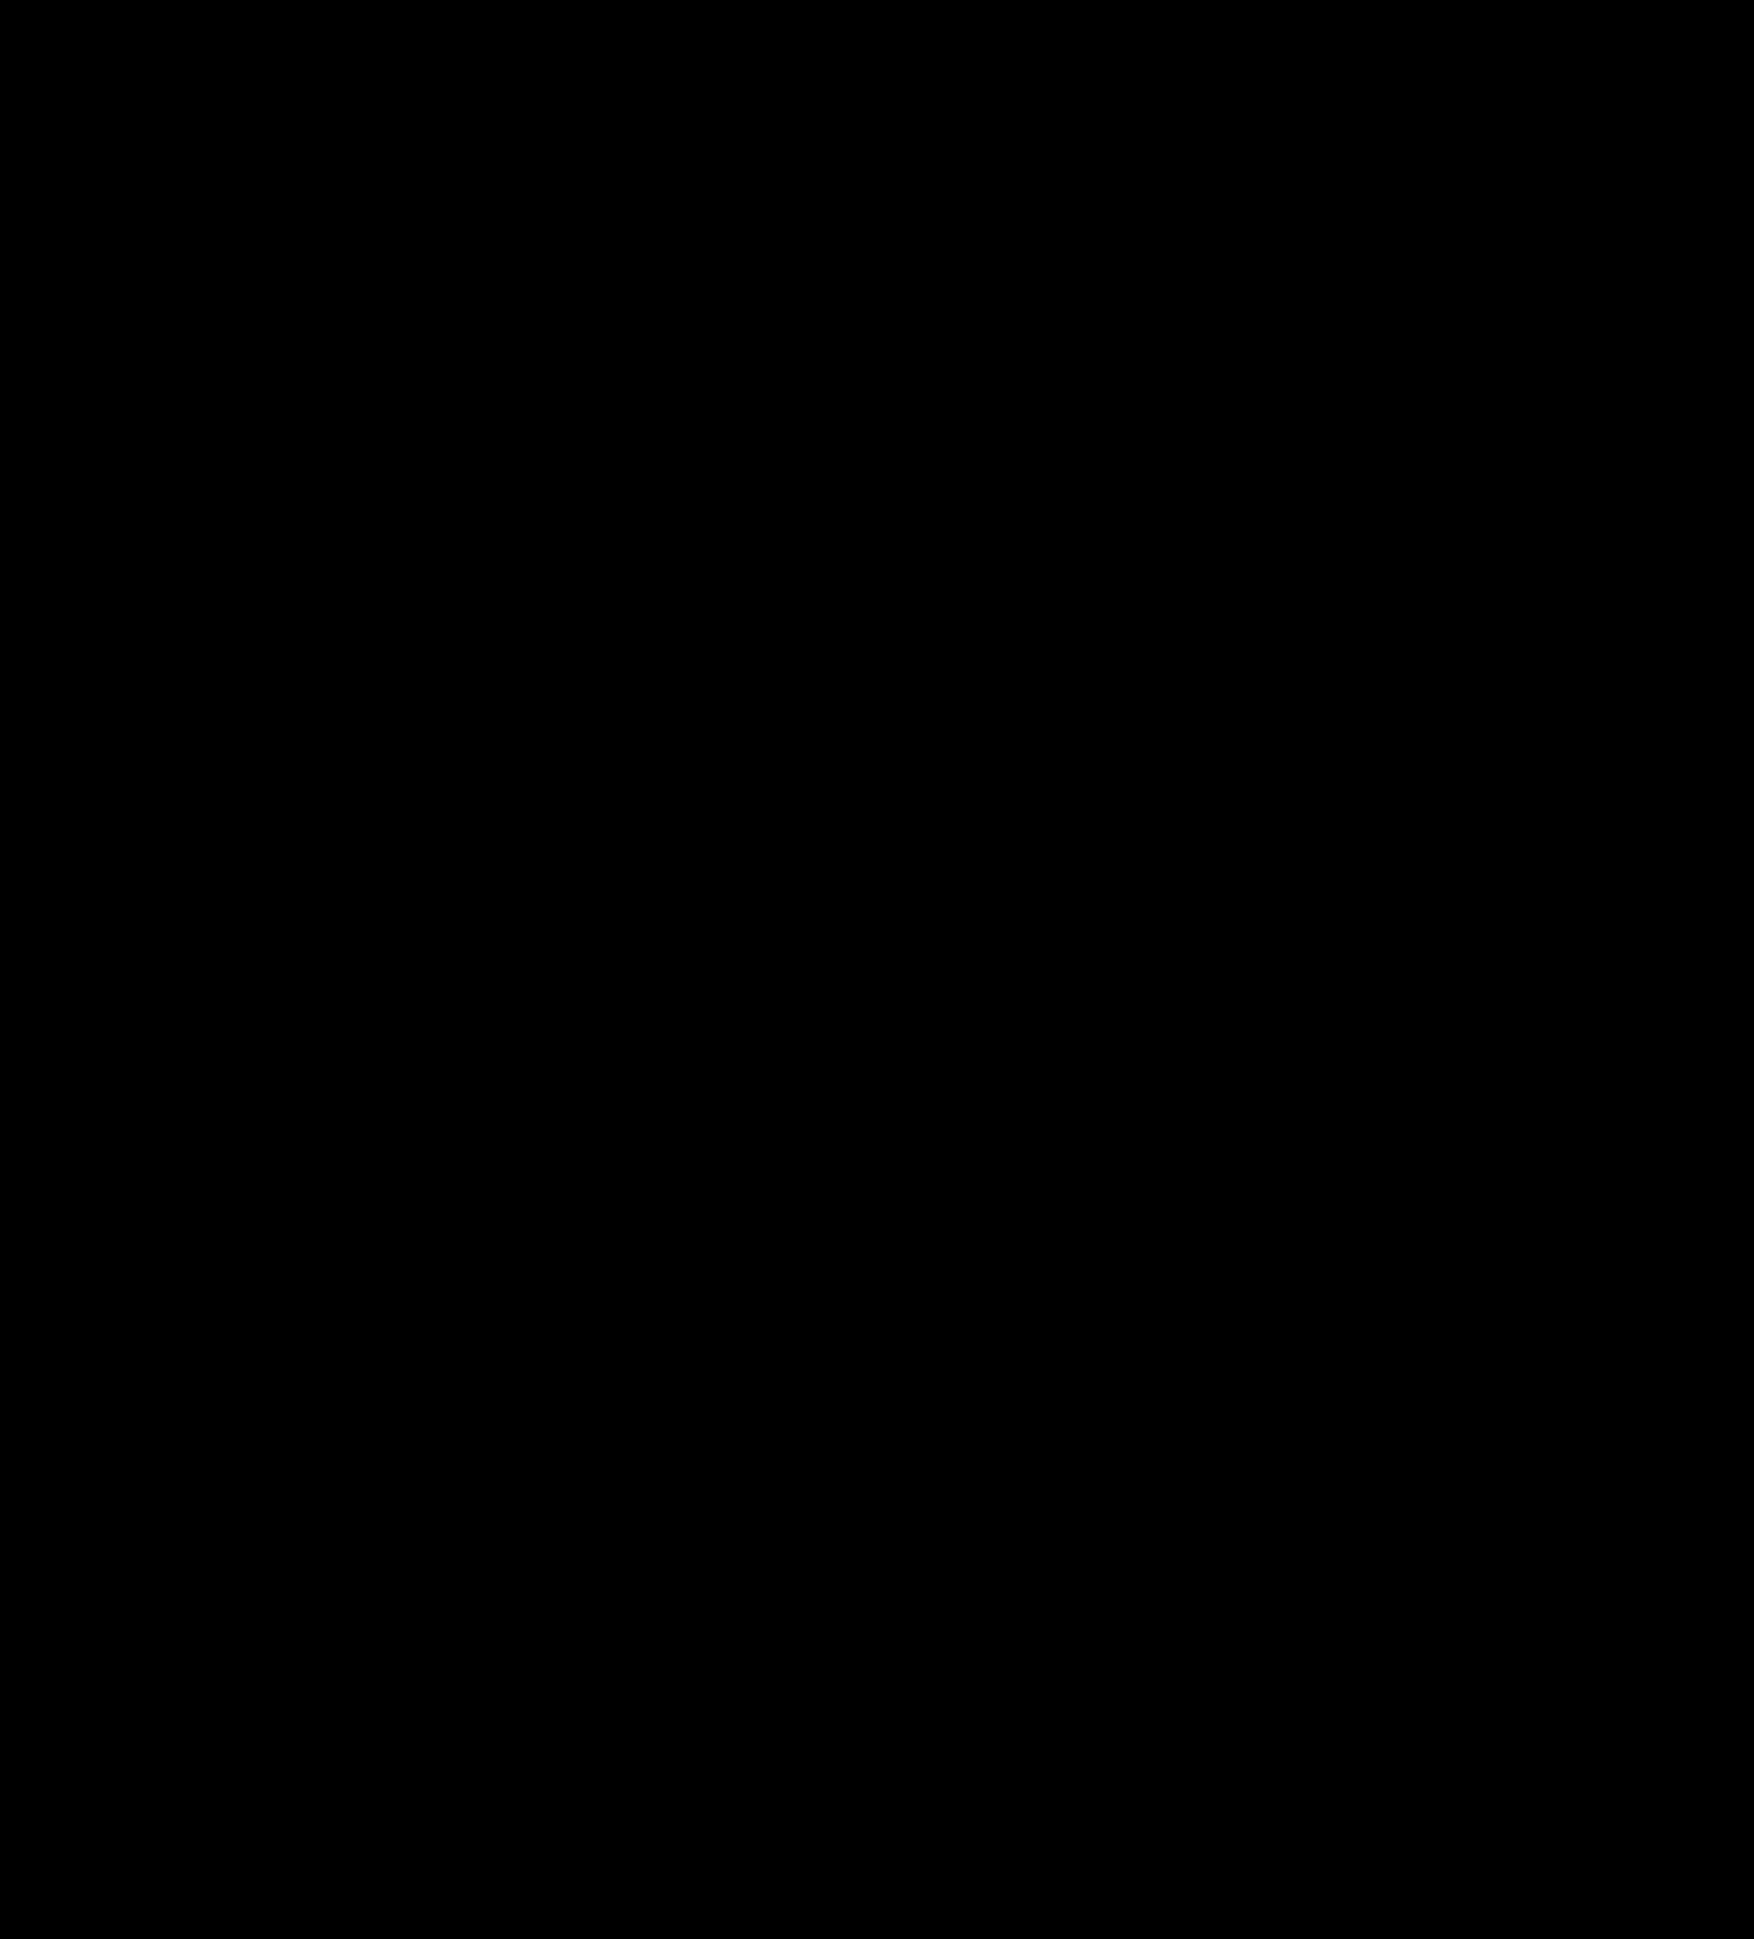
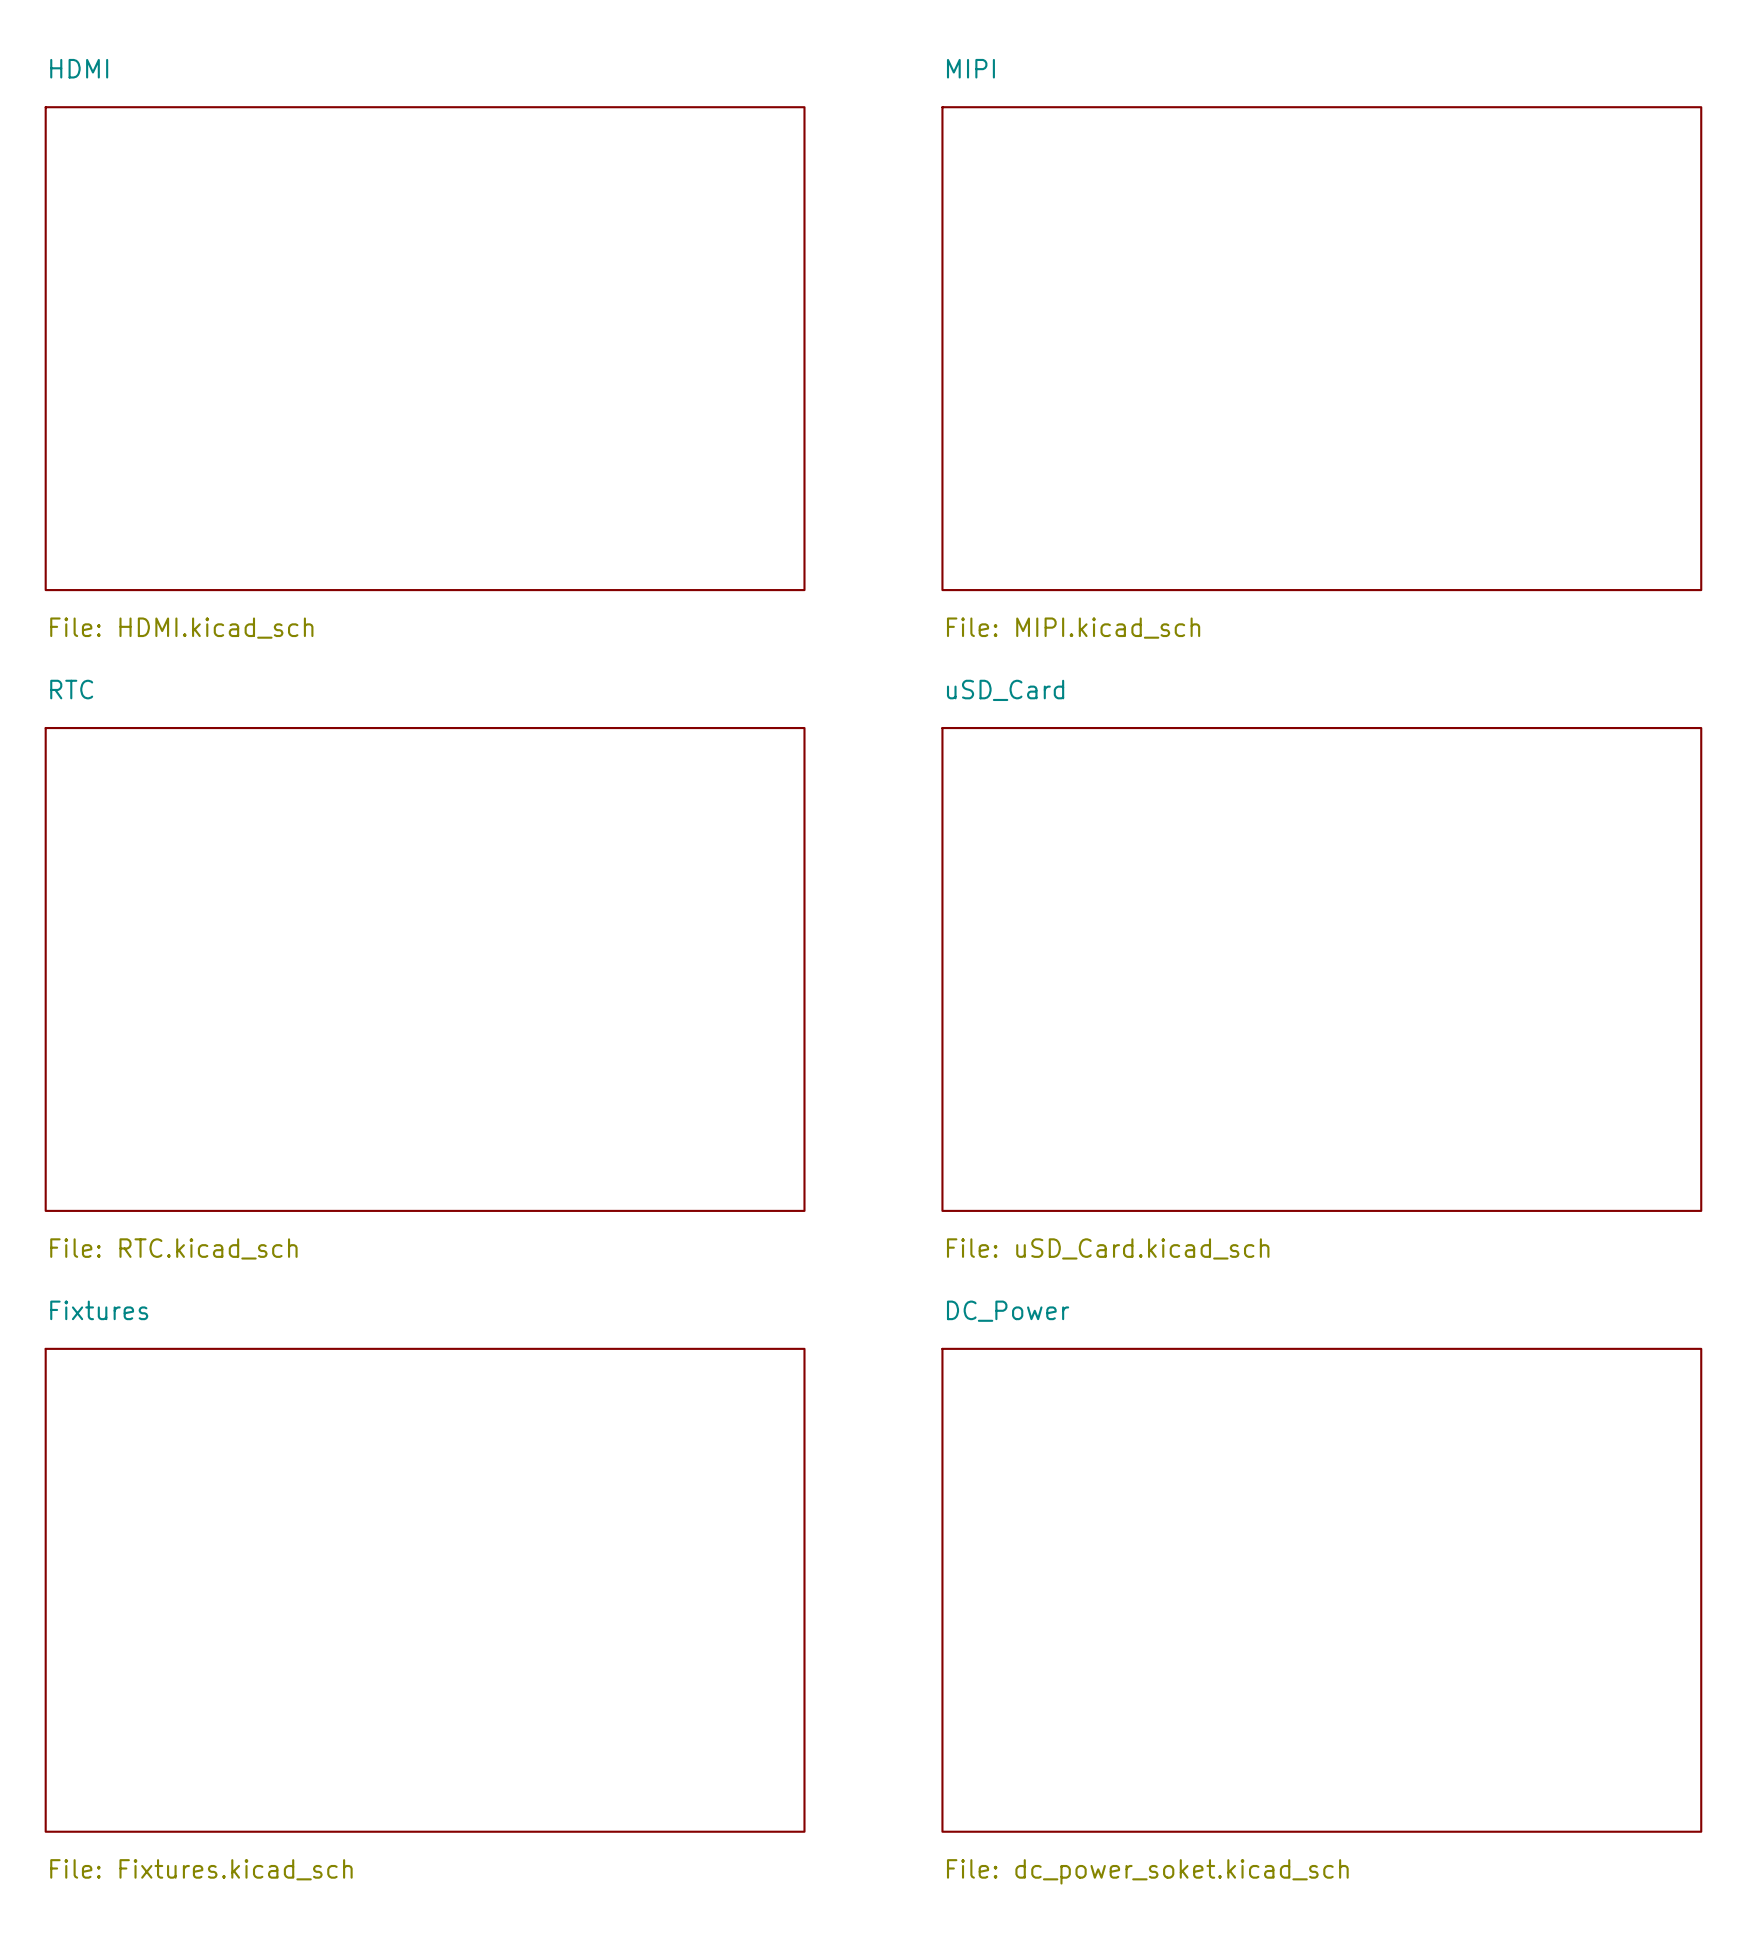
sheet HDMI: none -> File: HDMI.kicad_sch (425, 348)
sheet MIPI: none -> File: MIPI.kicad_sch (1321, 348)
sheet RTC: none -> File: RTC.kicad_sch (425, 969)
sheet uSD_Card: none -> File: uSD_Card.kicad_sch (1321, 969)
sheet Fixtures: none -> File: Fixtures.kicad_sch (425, 1590)
sheet DC_Power: none -> File: dc_power_soket.kicad_sch (1321, 1590)

